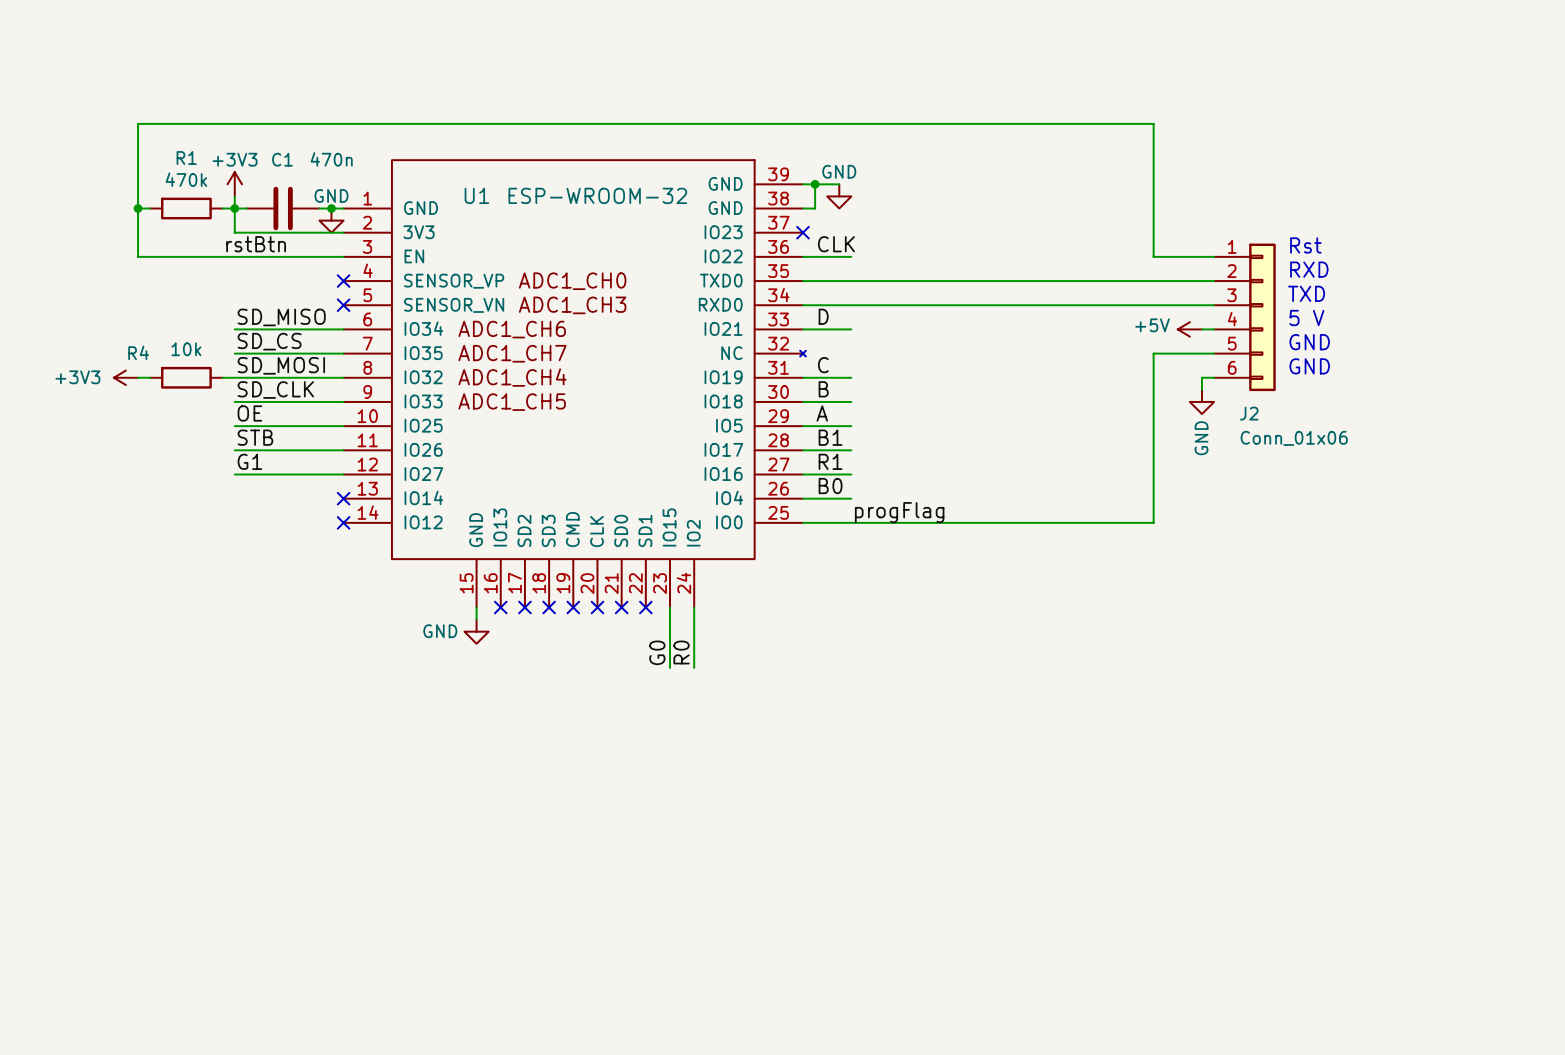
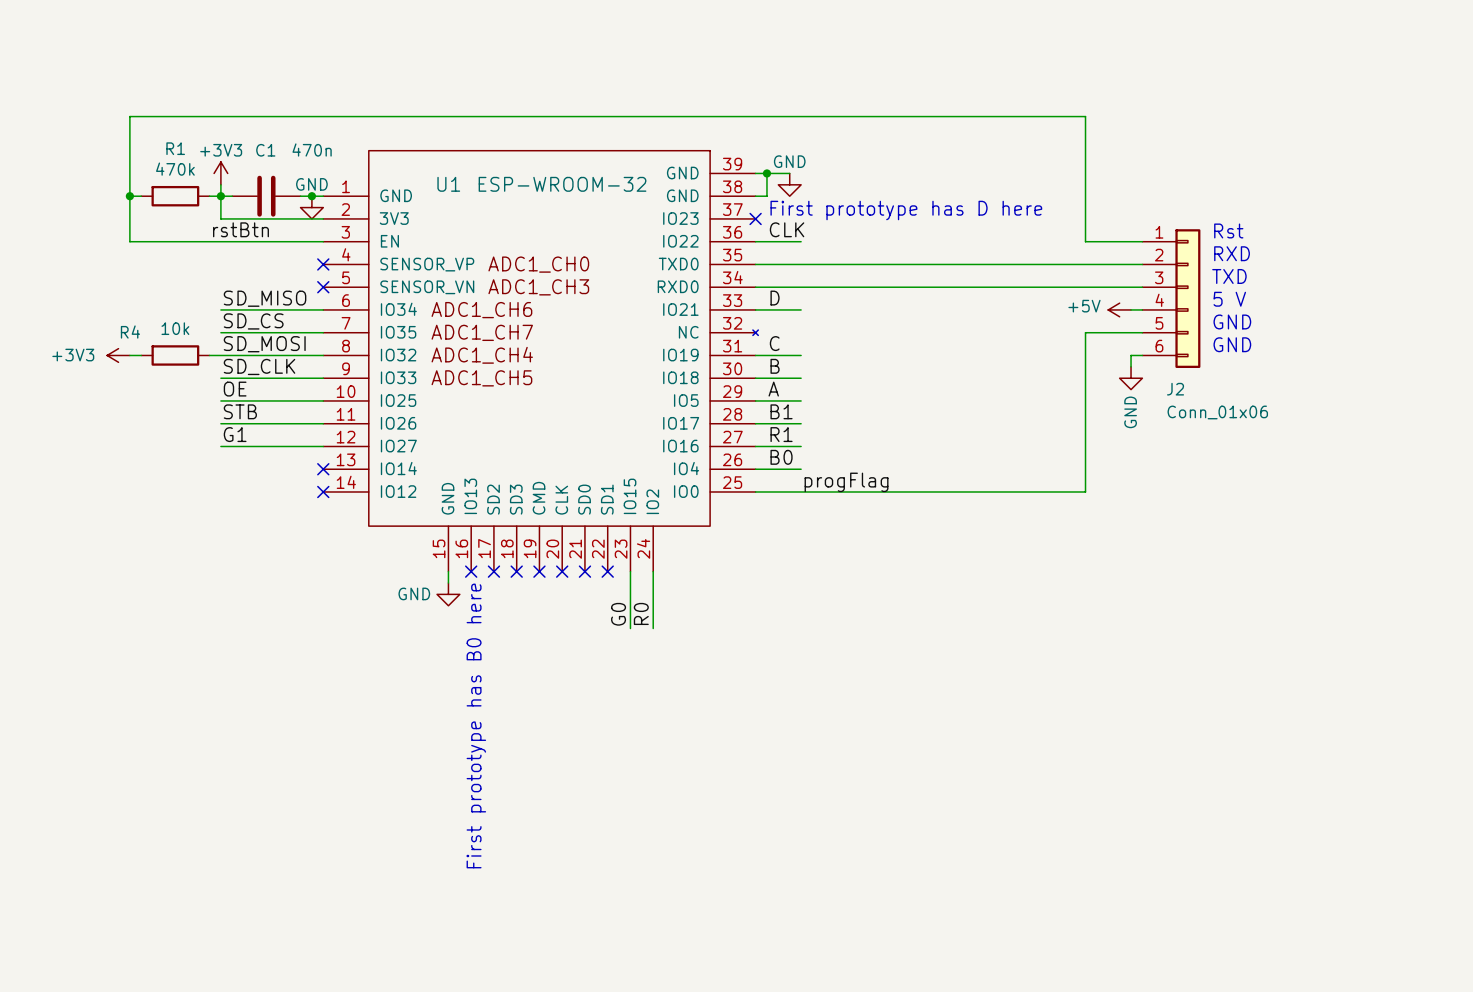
text: none -> First prototype has D here (906, 210)
text: none -> First prototype has B0 here (476, 725)

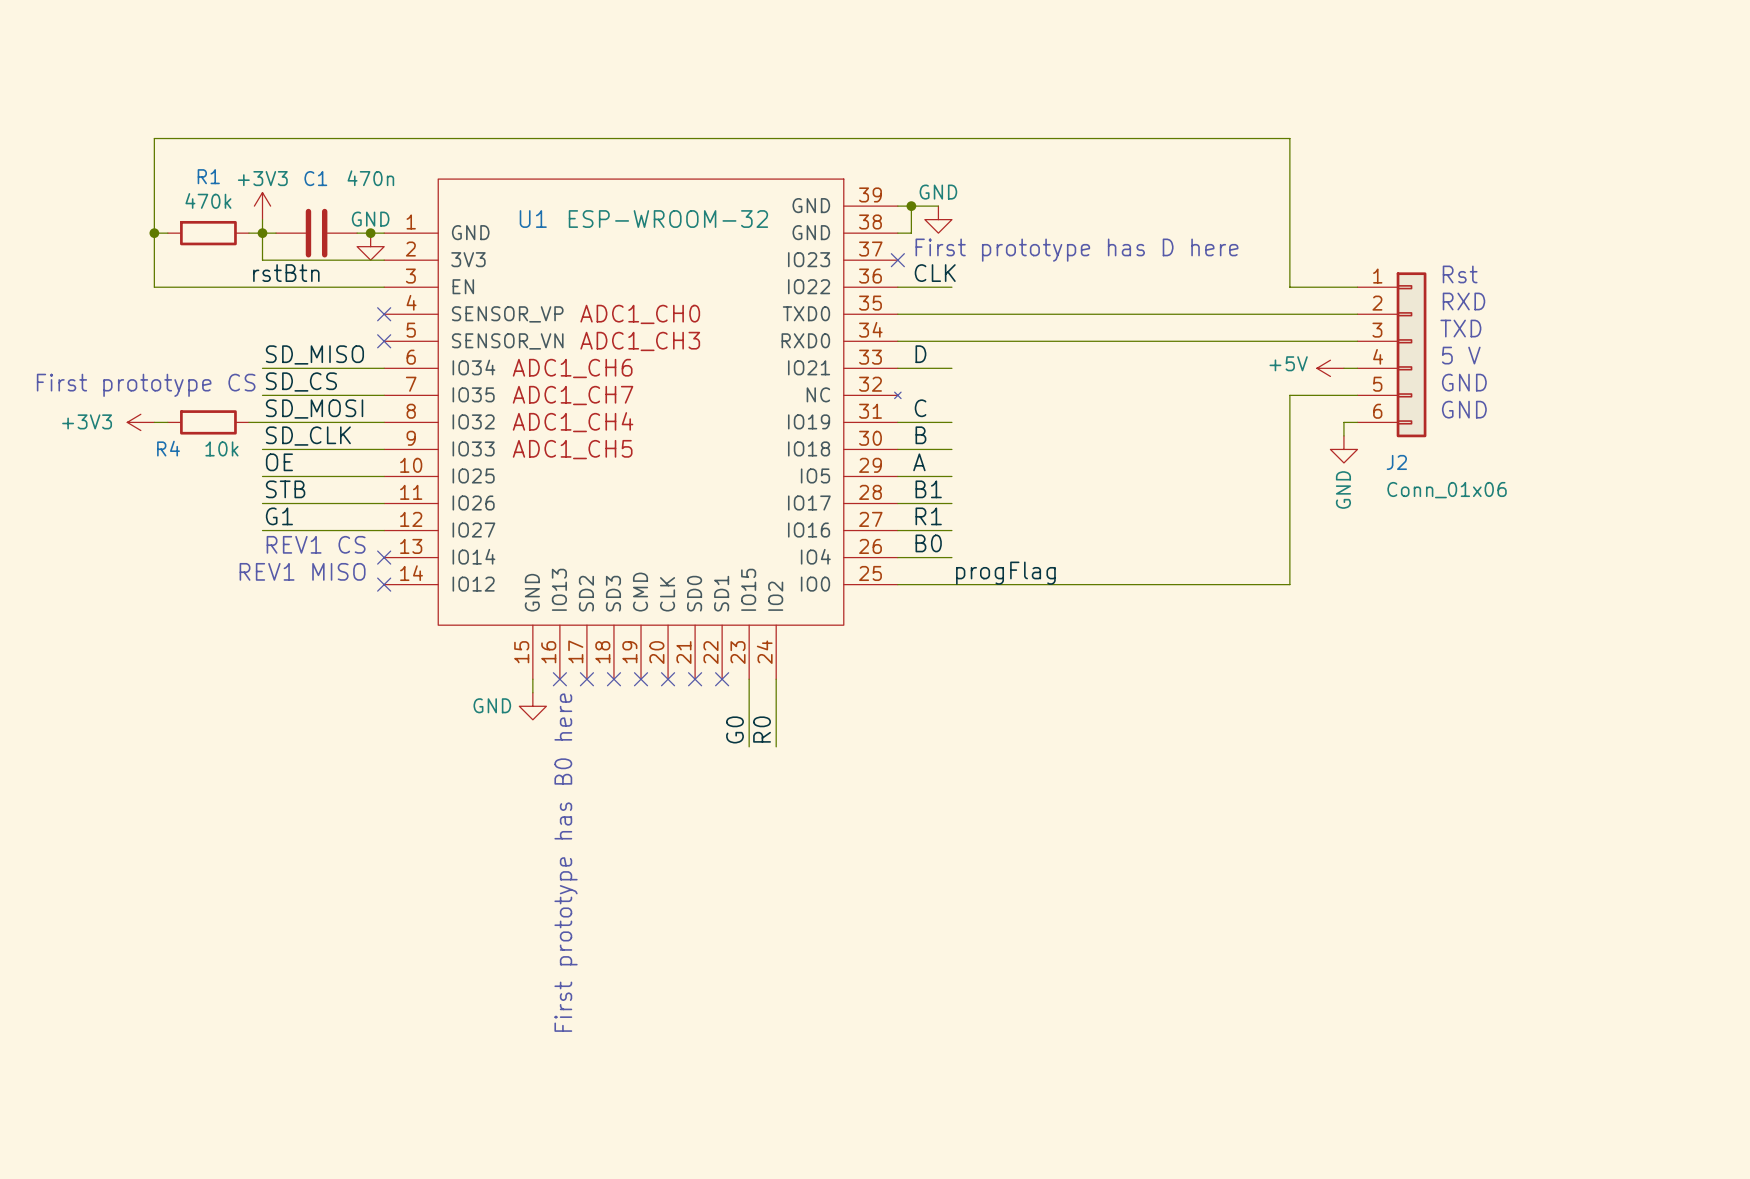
text: none -> First prototype CS (146, 385)
R4 value position: 10k (175, 328) -> 10k (221, 448)
R4 name position: R4 (130, 332) -> R4 (168, 448)
text: none -> REV1 CS (316, 544)
text: none -> REV1 MISO (302, 571)

